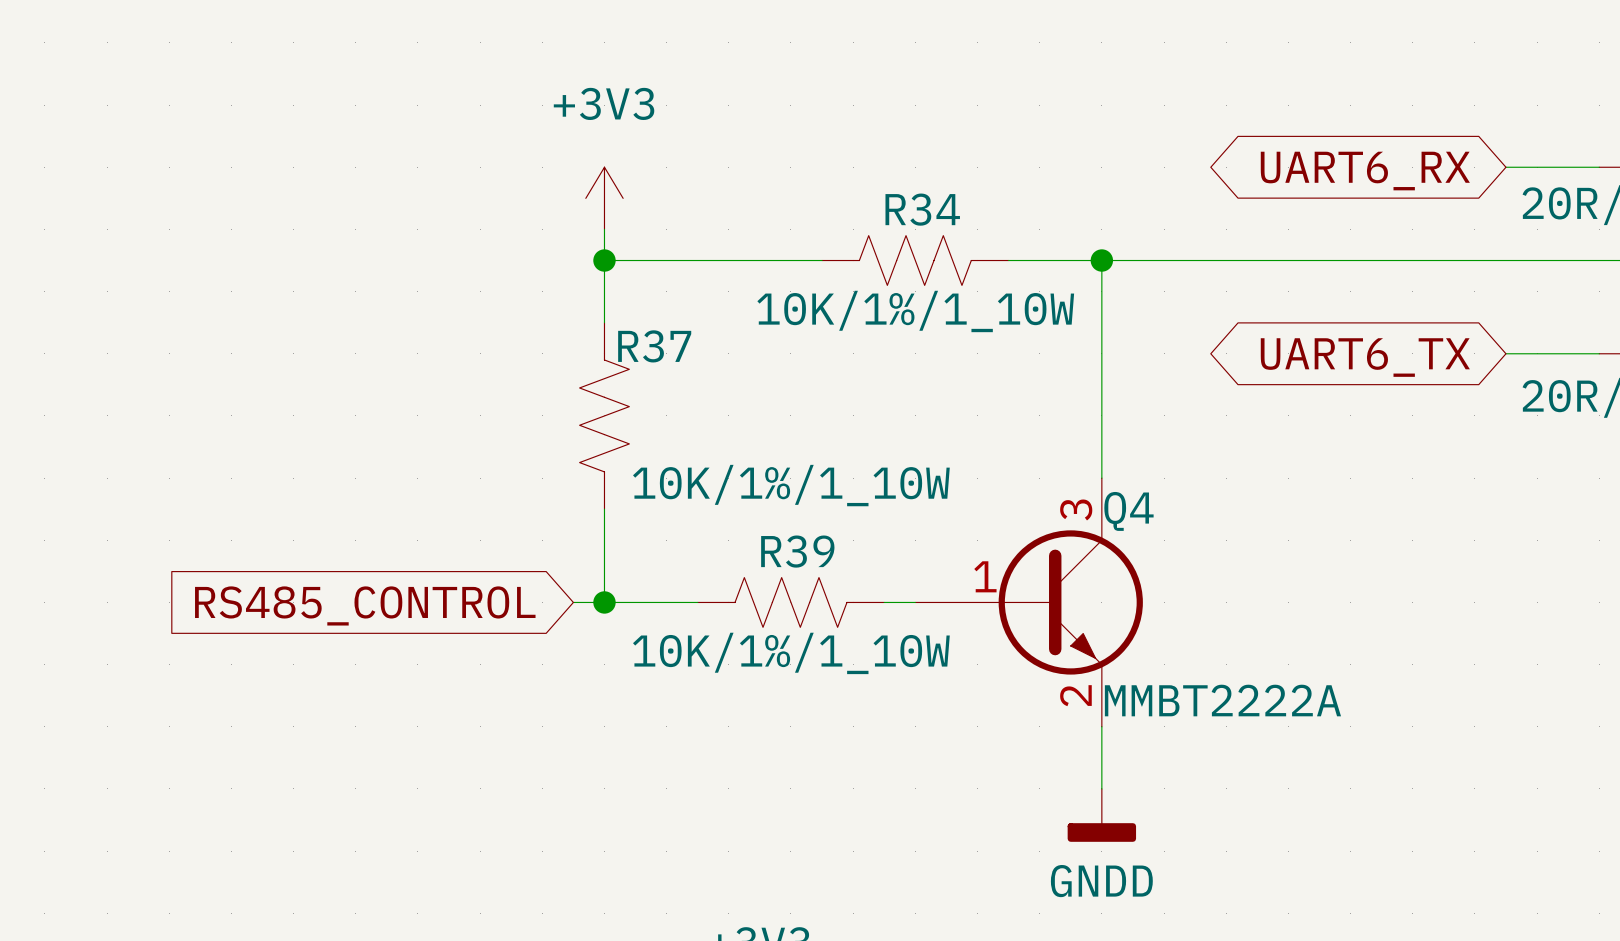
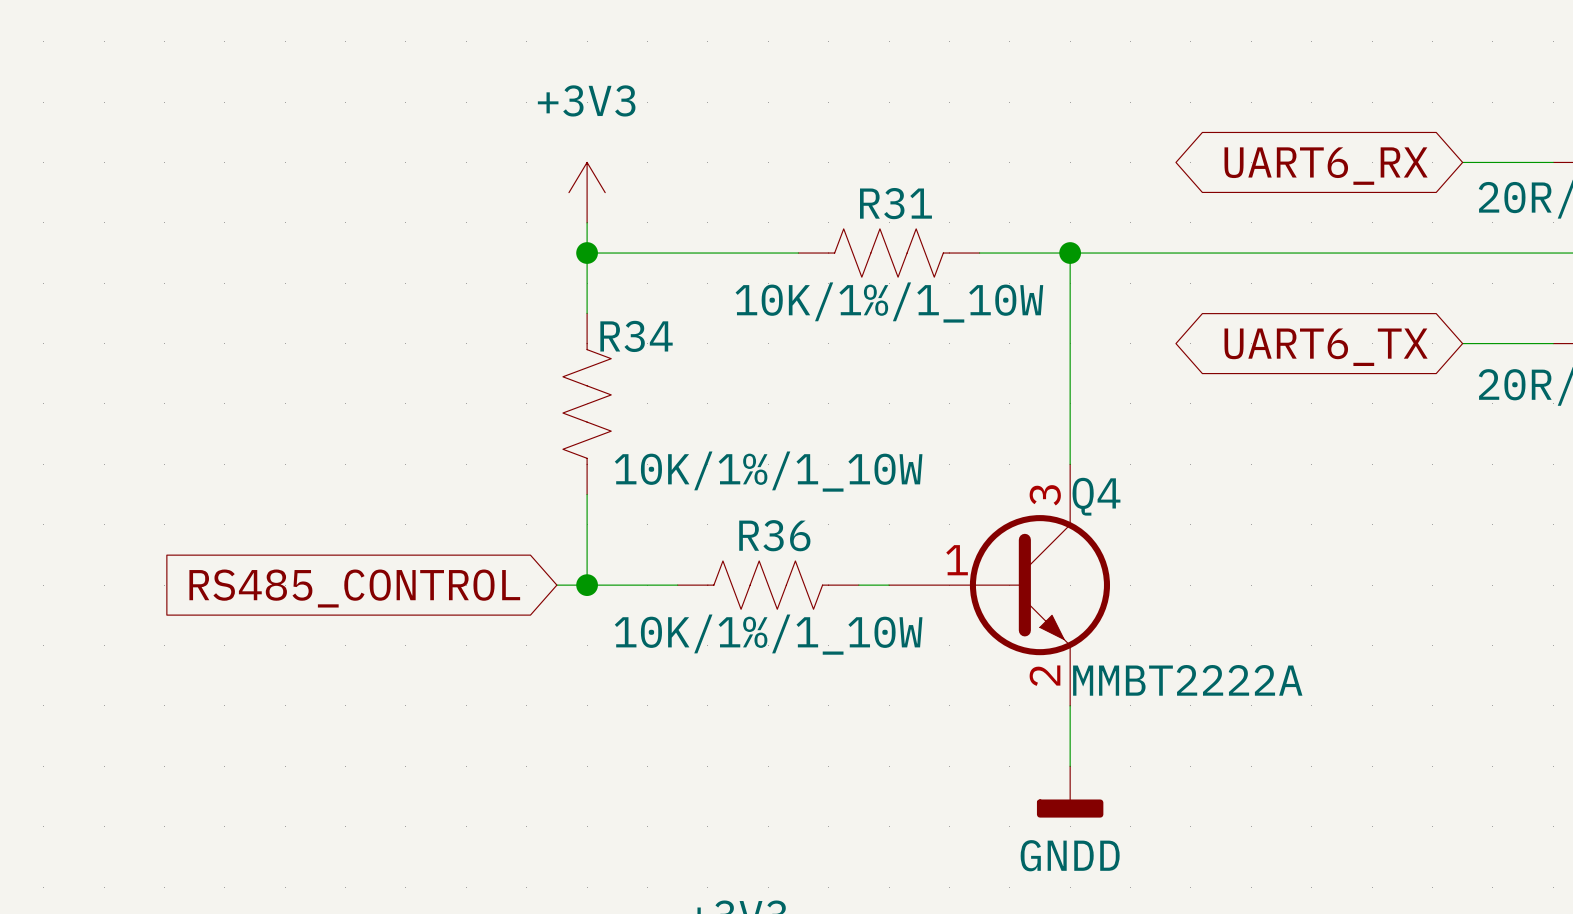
R34 name: R34 (922, 209) -> R31 (895, 203)
R37 name: R37 (654, 346) -> R34 (636, 336)
R39 name: R39 (797, 551) -> R36 (774, 535)

